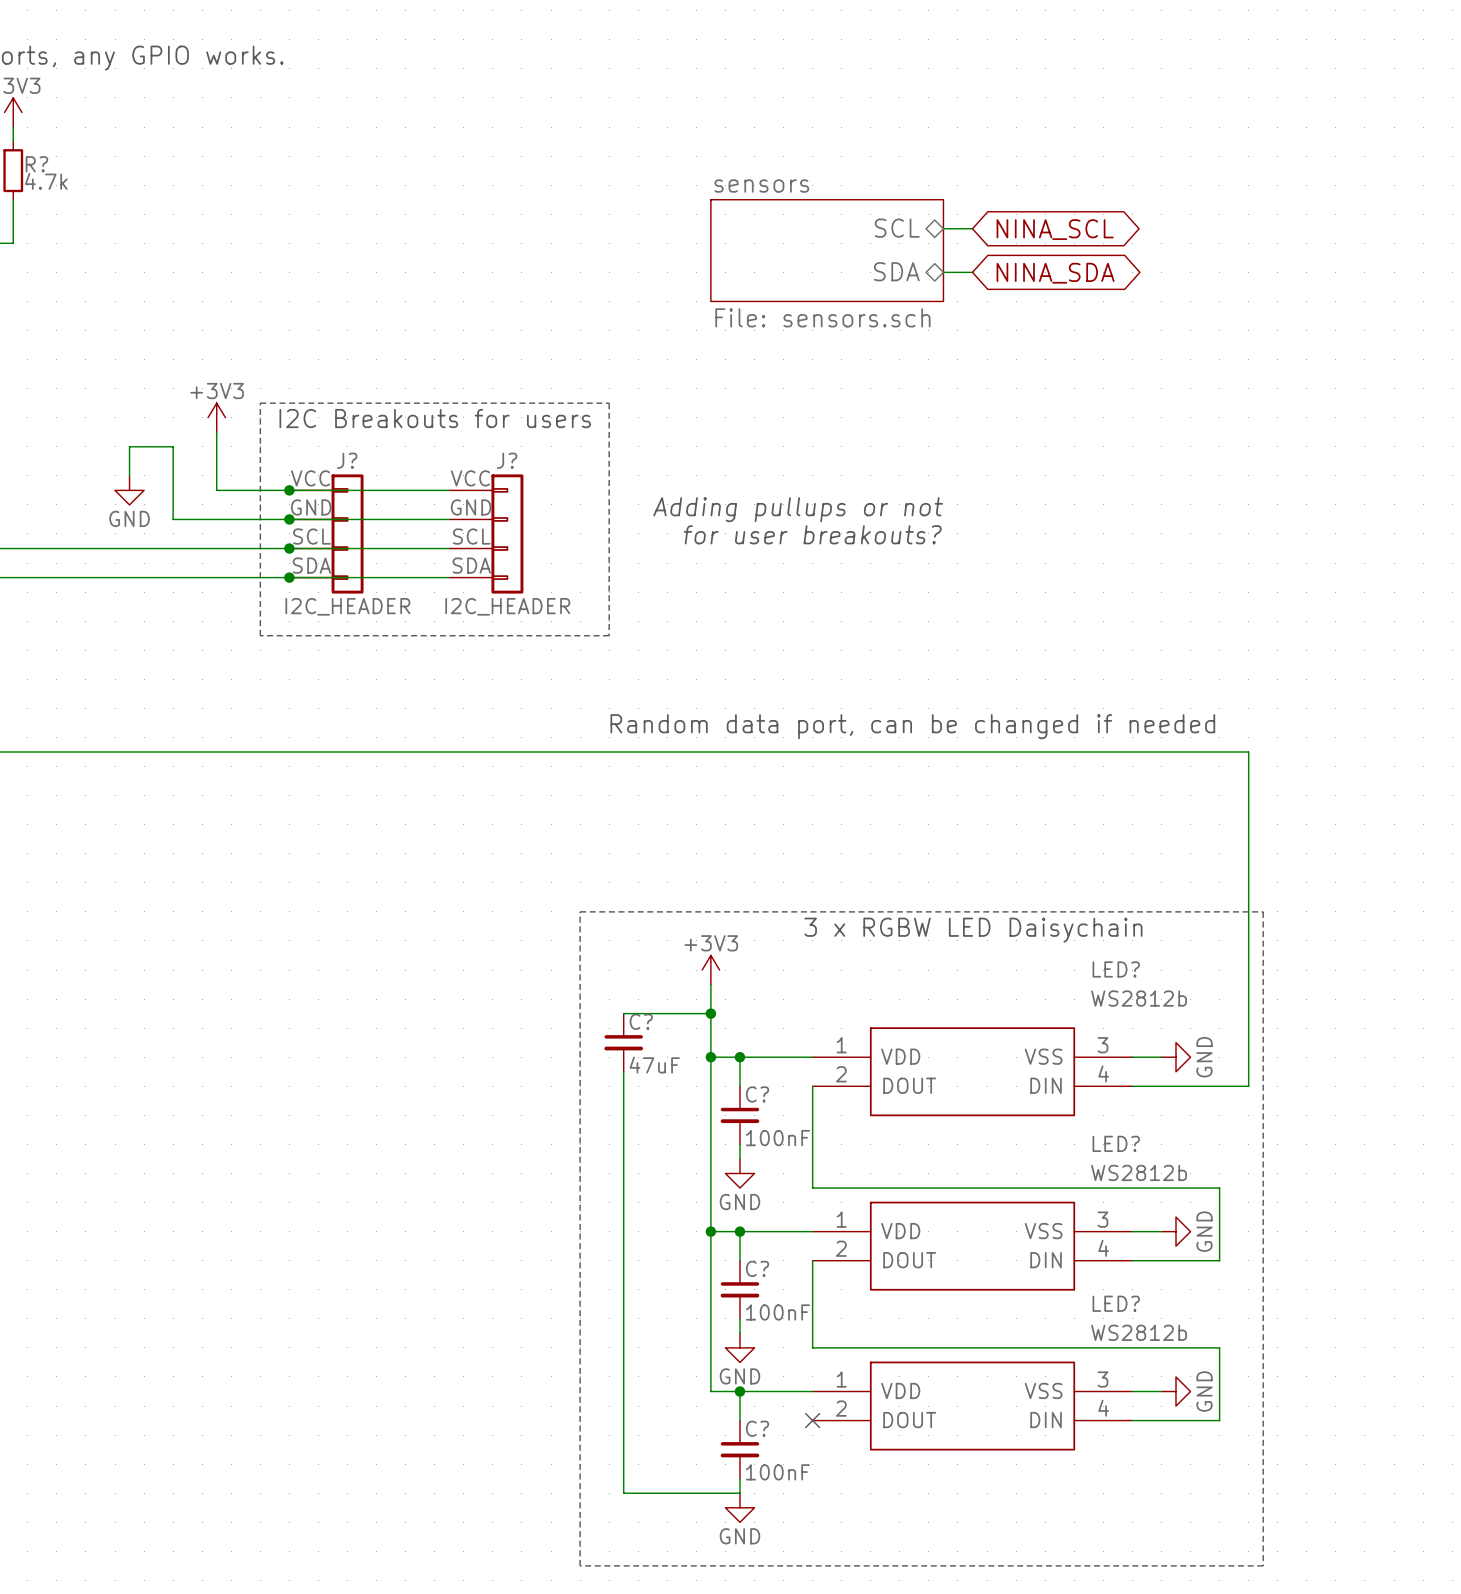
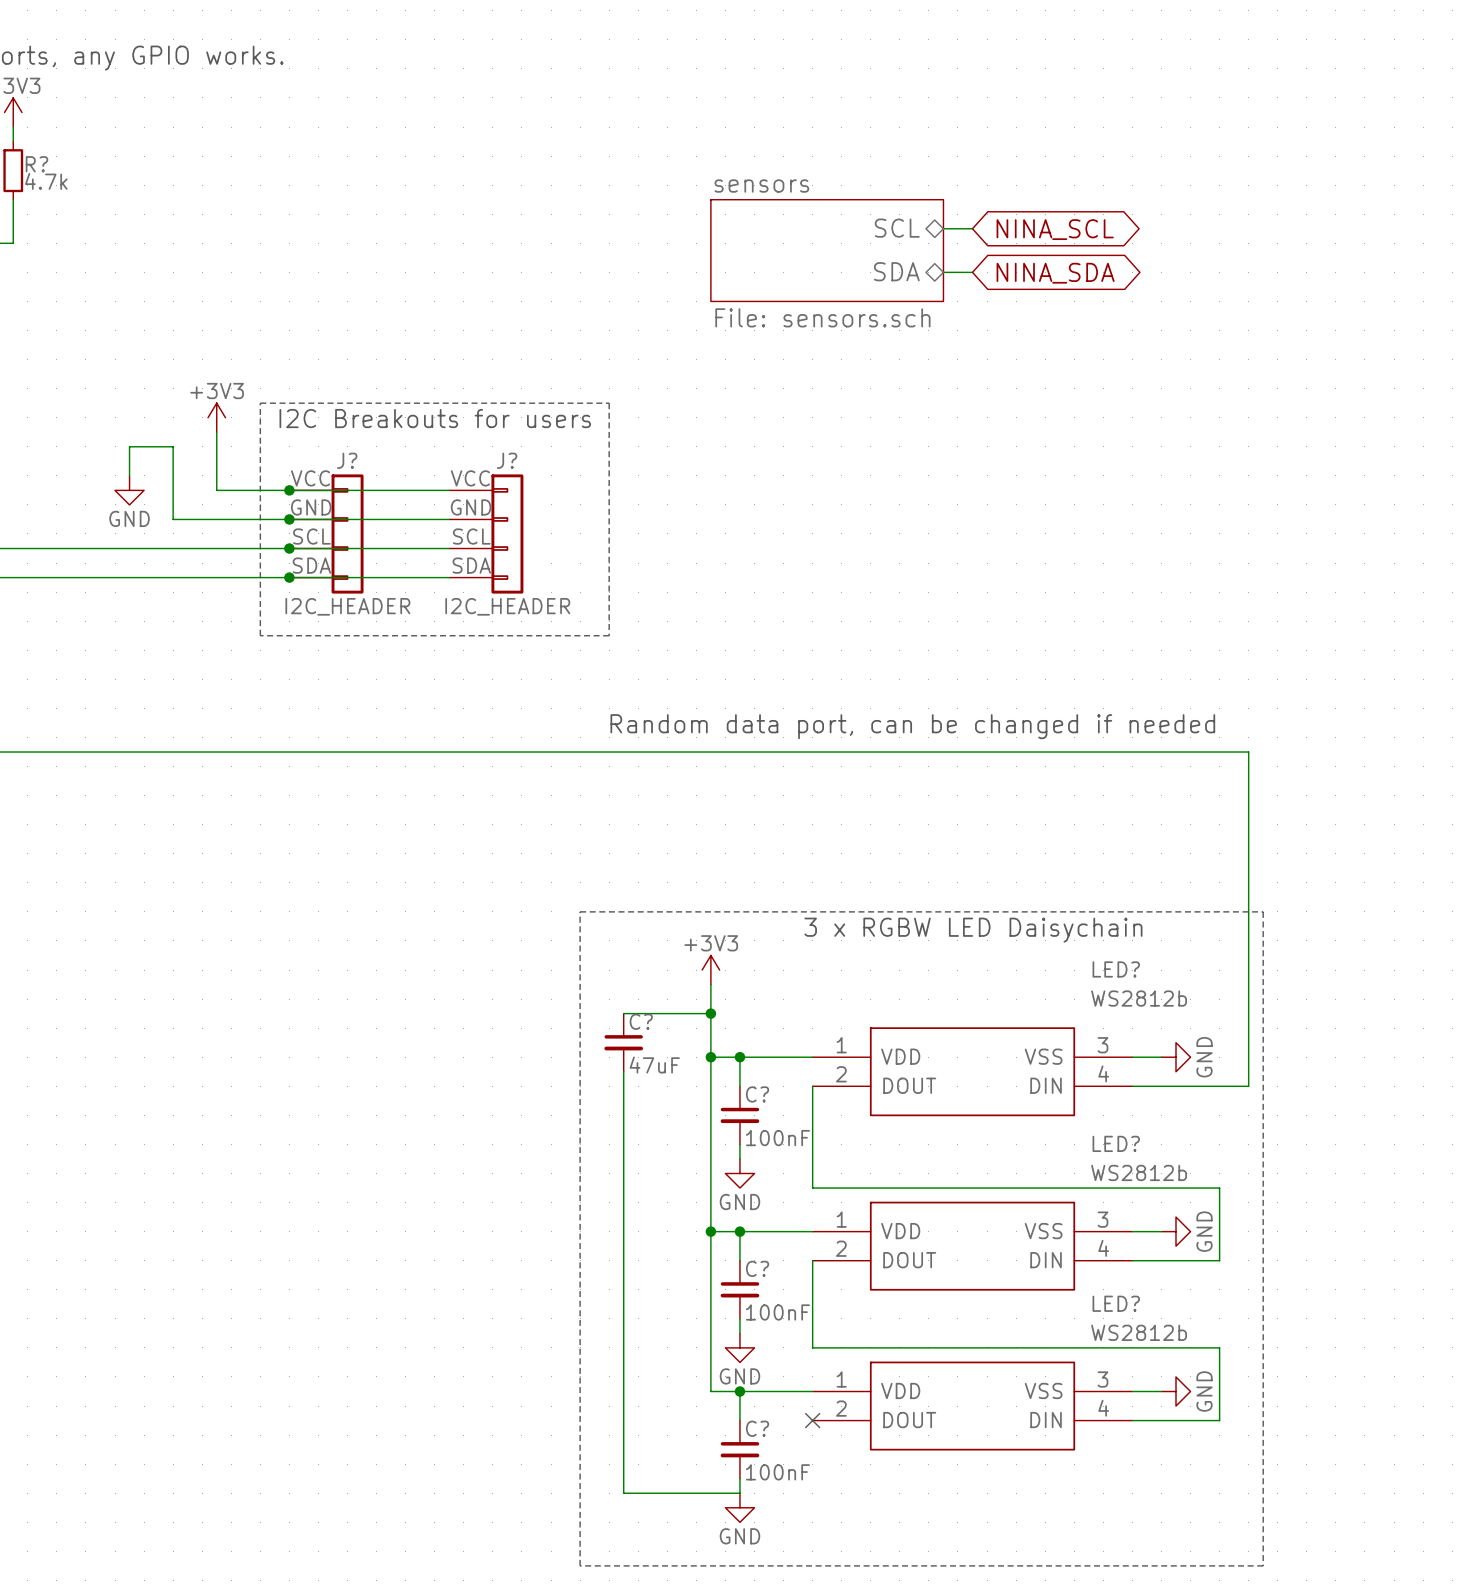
text: Adding pullups or not (798, 509) -> none
text: for user breakouts? (812, 534) -> none

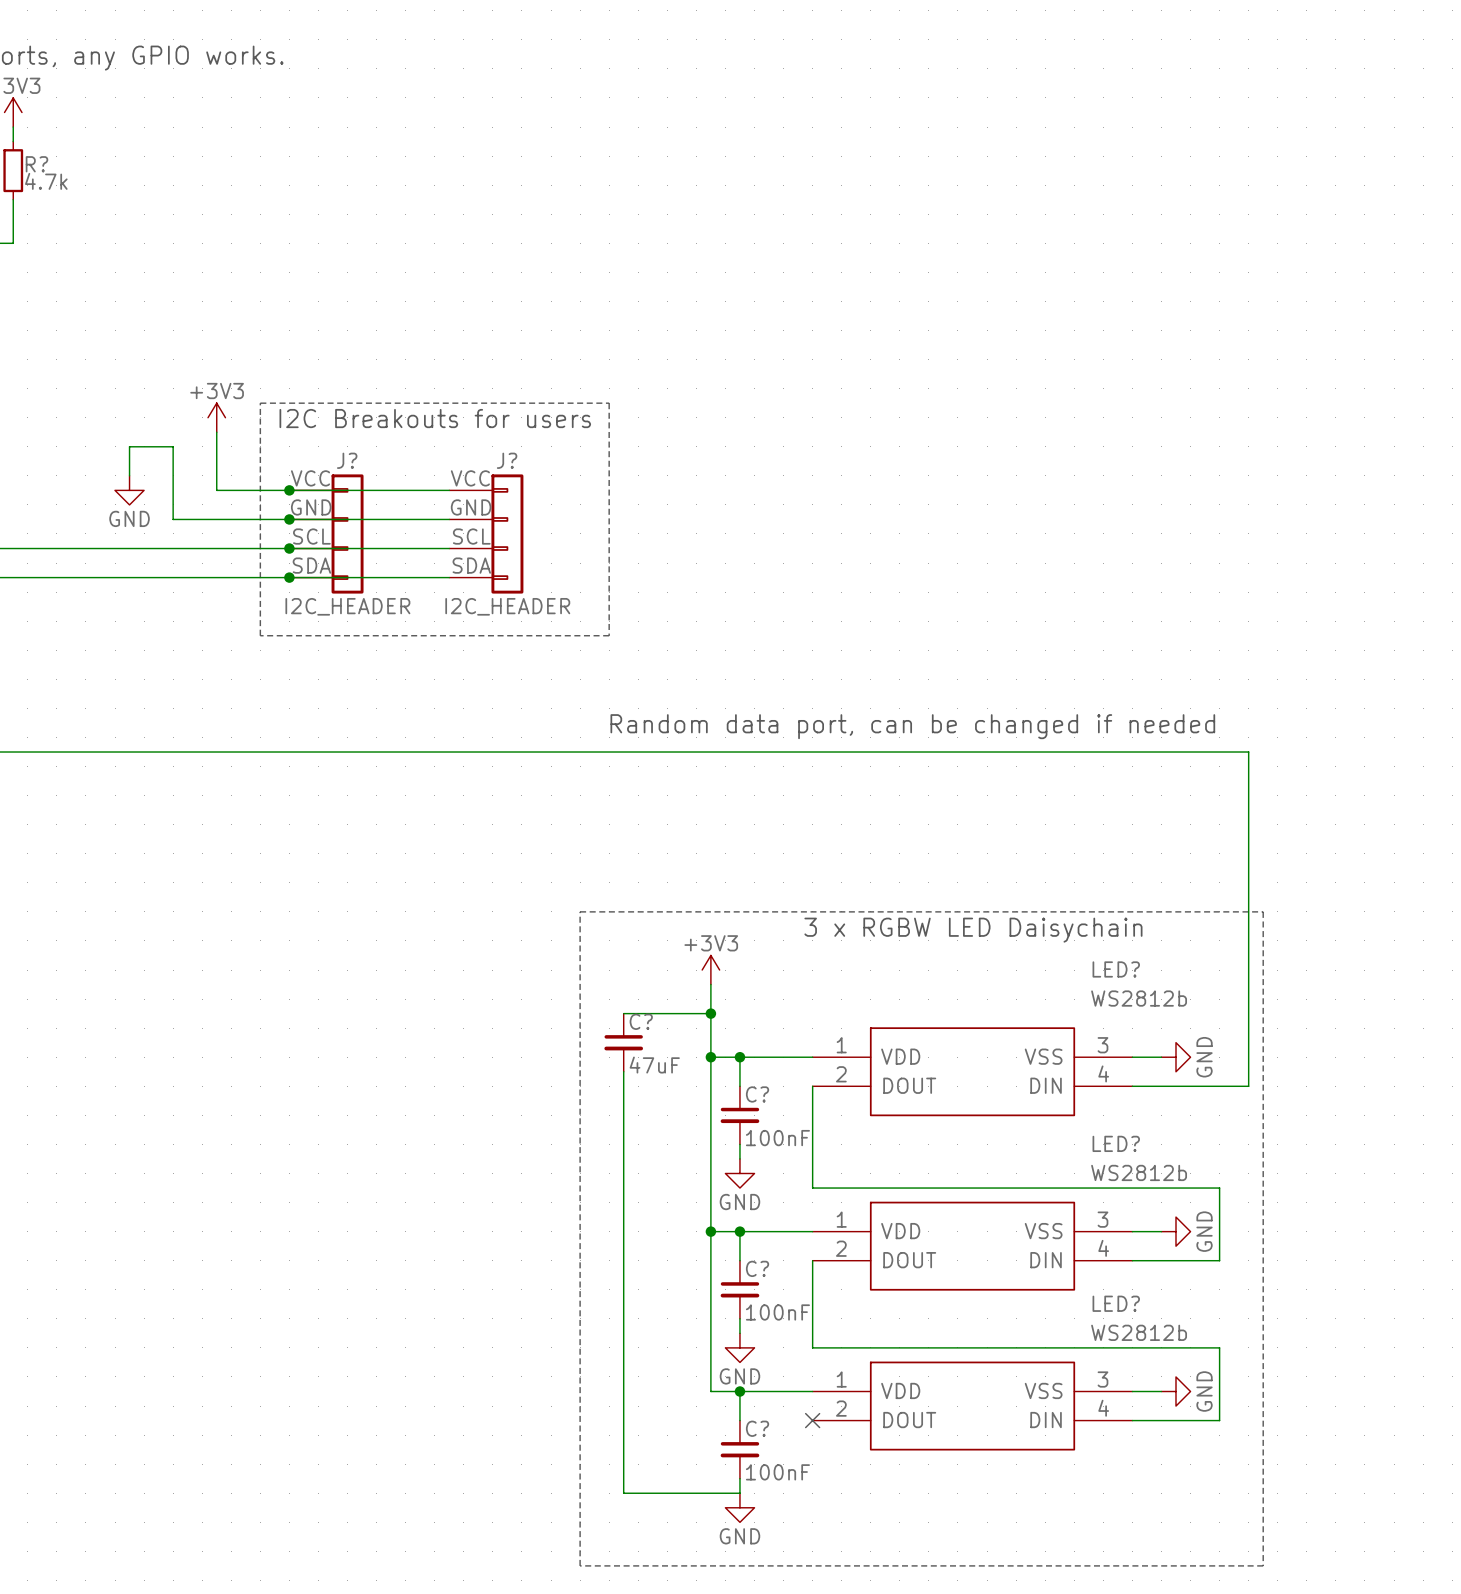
sheet pin: SCL (897, 228) -> none
wire: (943, 228) (972, 228) -> none
global label: NINA_SCL (1055, 229) -> none
sheet sensors: File: sensors.sch (827, 250) -> none
sheet pin: SDA (896, 271) -> none
wire: (943, 272) (972, 272) -> none
global label: NINA_SDA (1055, 273) -> none

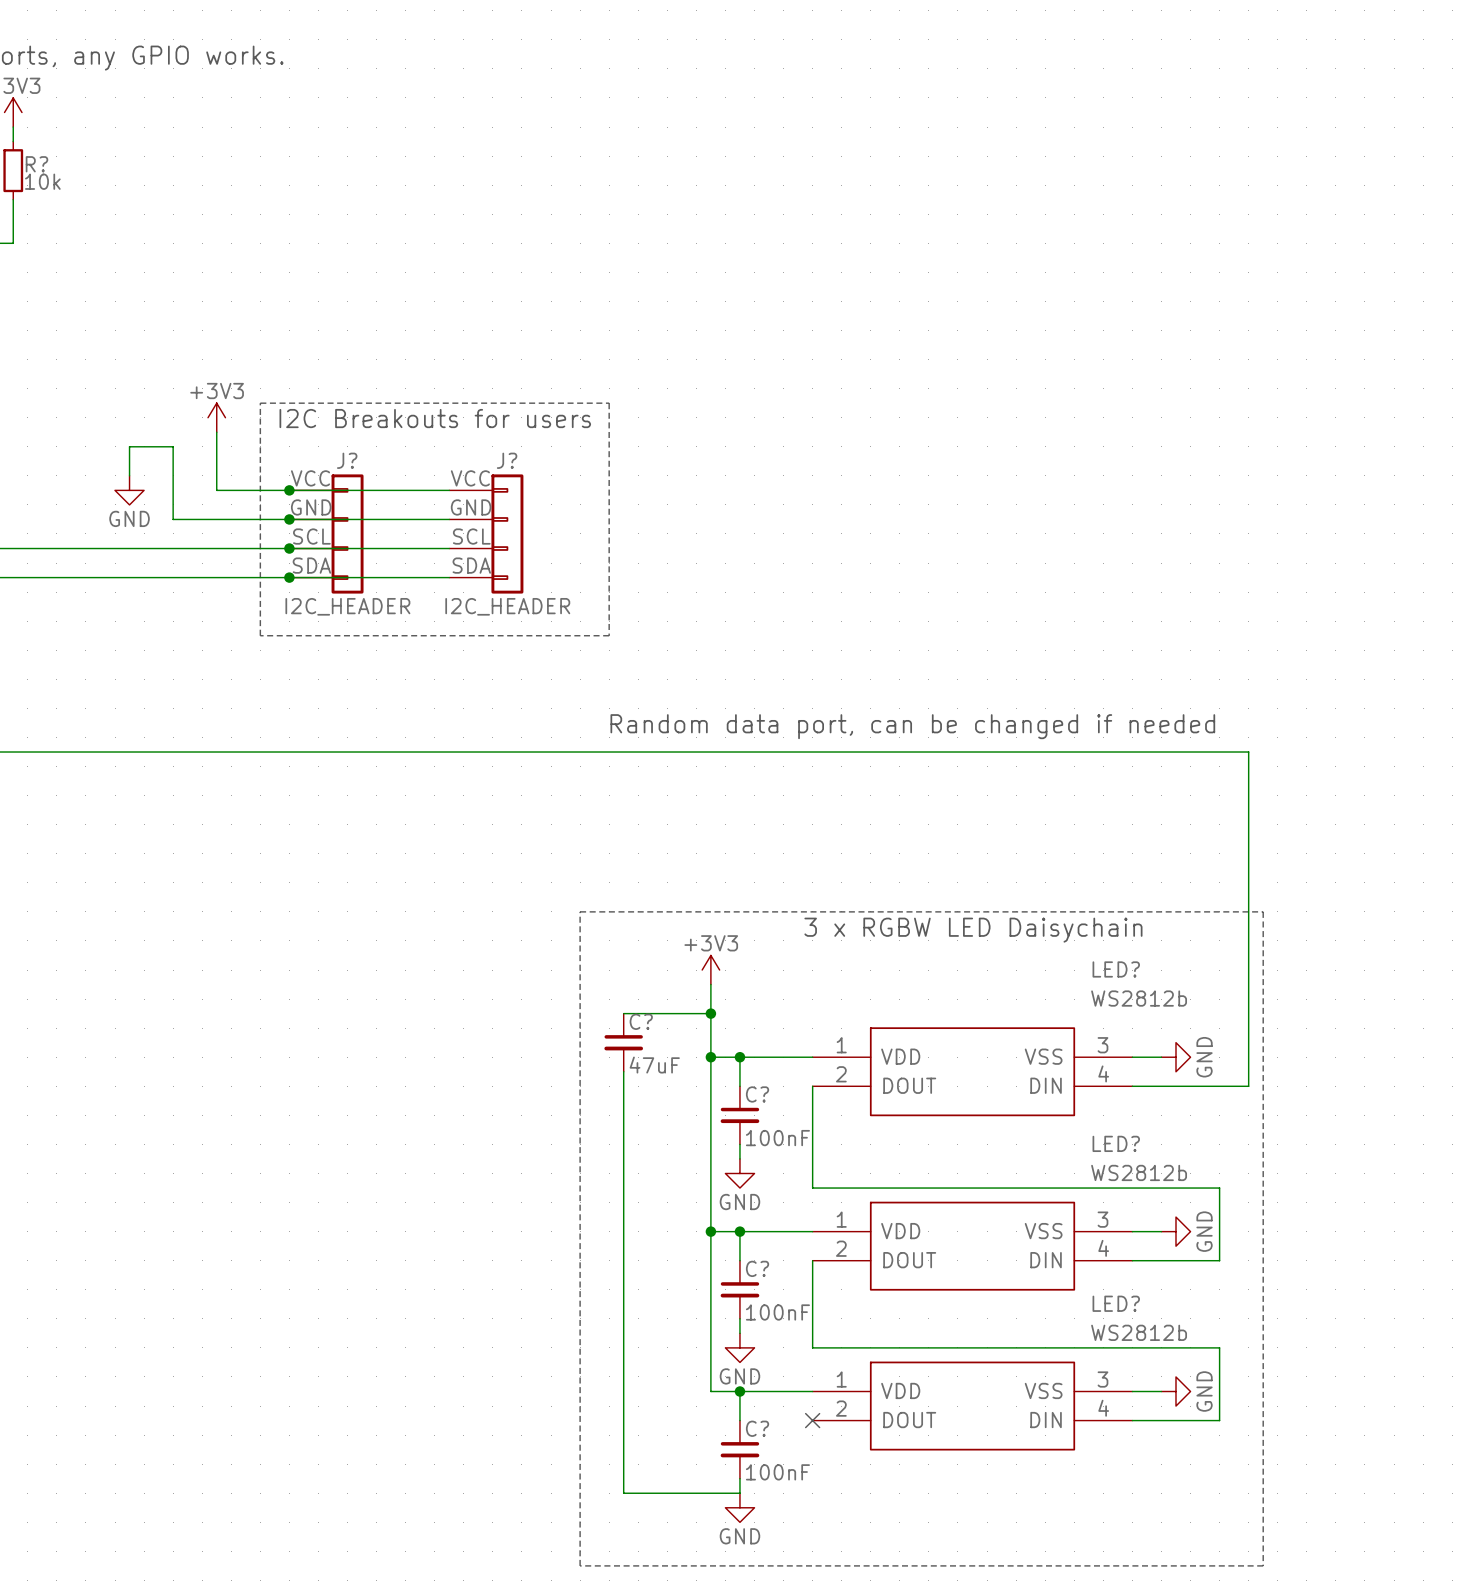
R? value: 4.7k (46, 181) -> 10k (42, 181)

